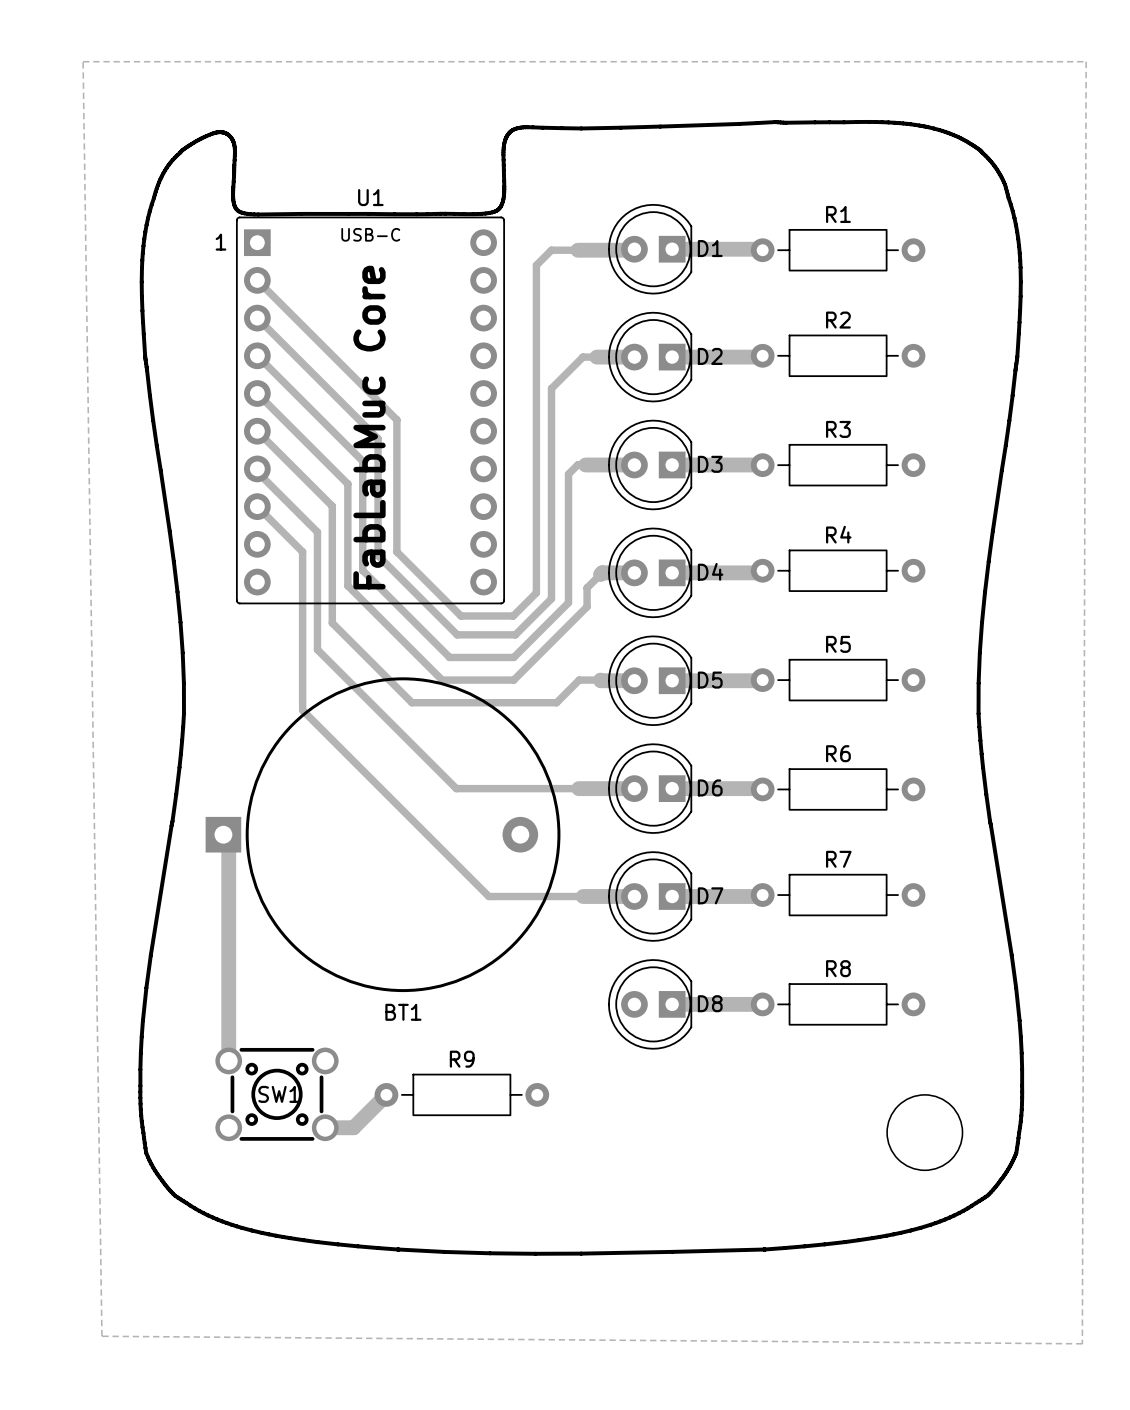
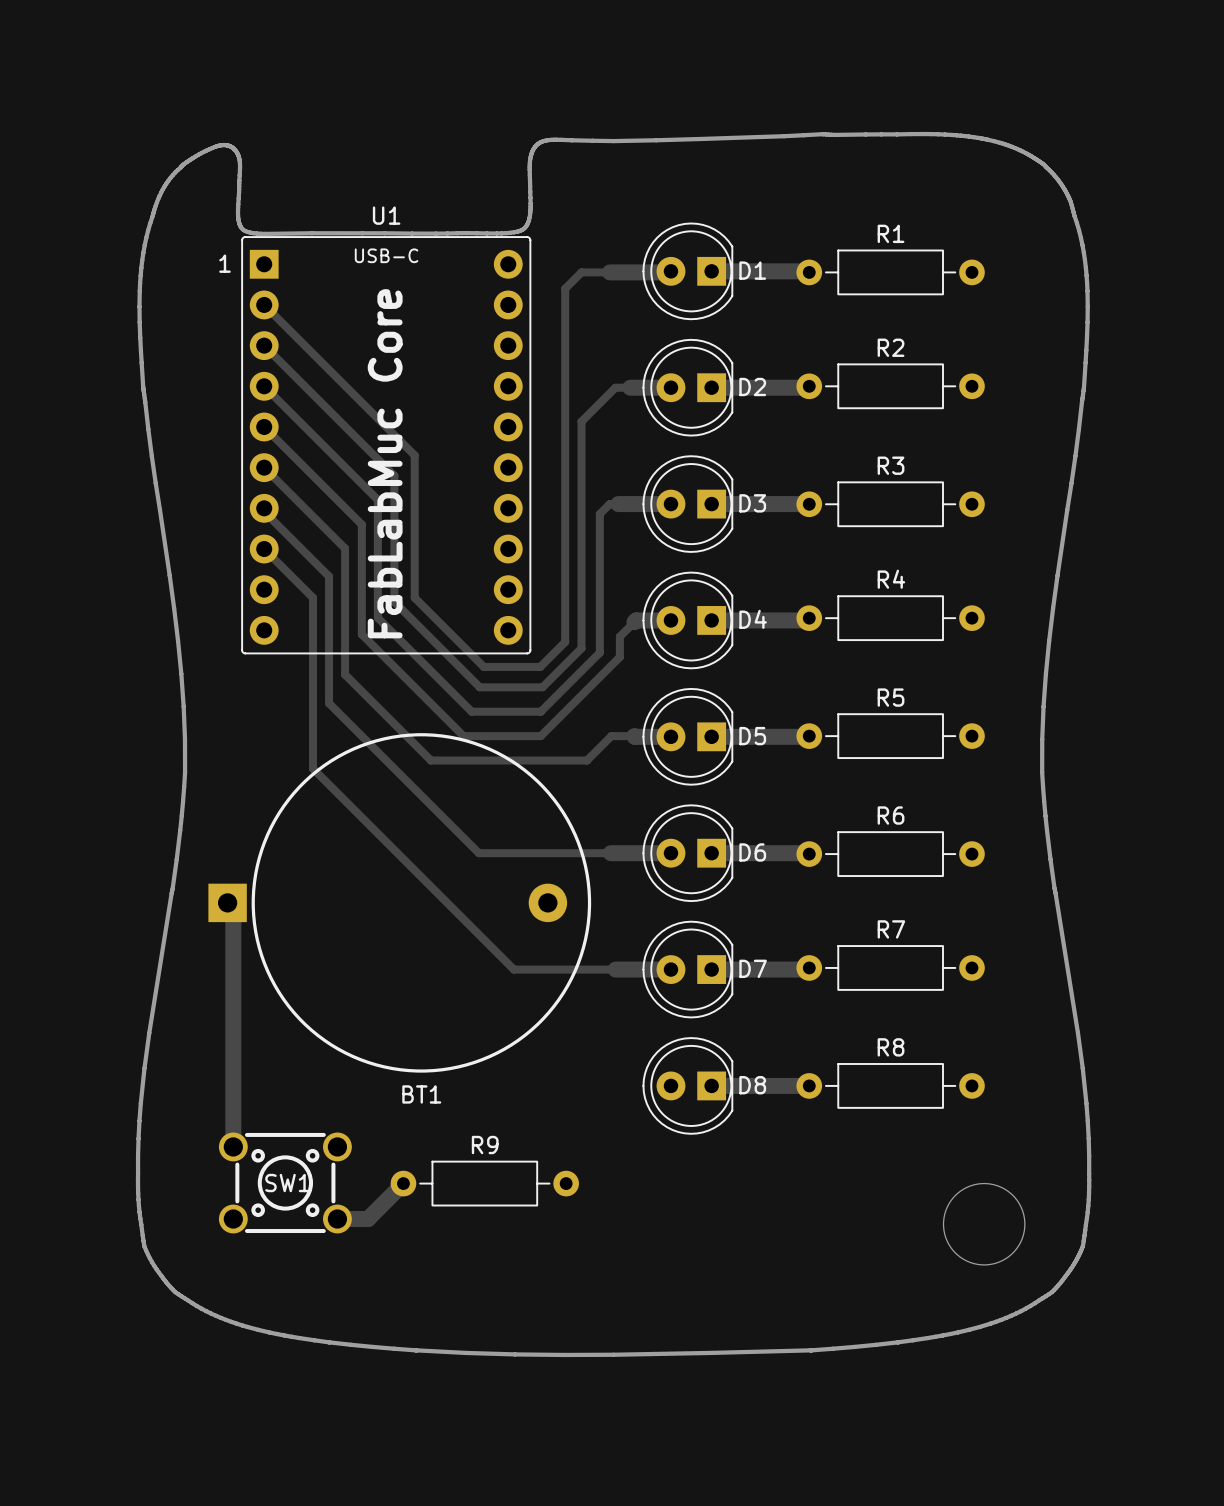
zone outline: (83, 61) (1086, 61) (1082, 1343) (101, 1336) (83, 61) -> none

